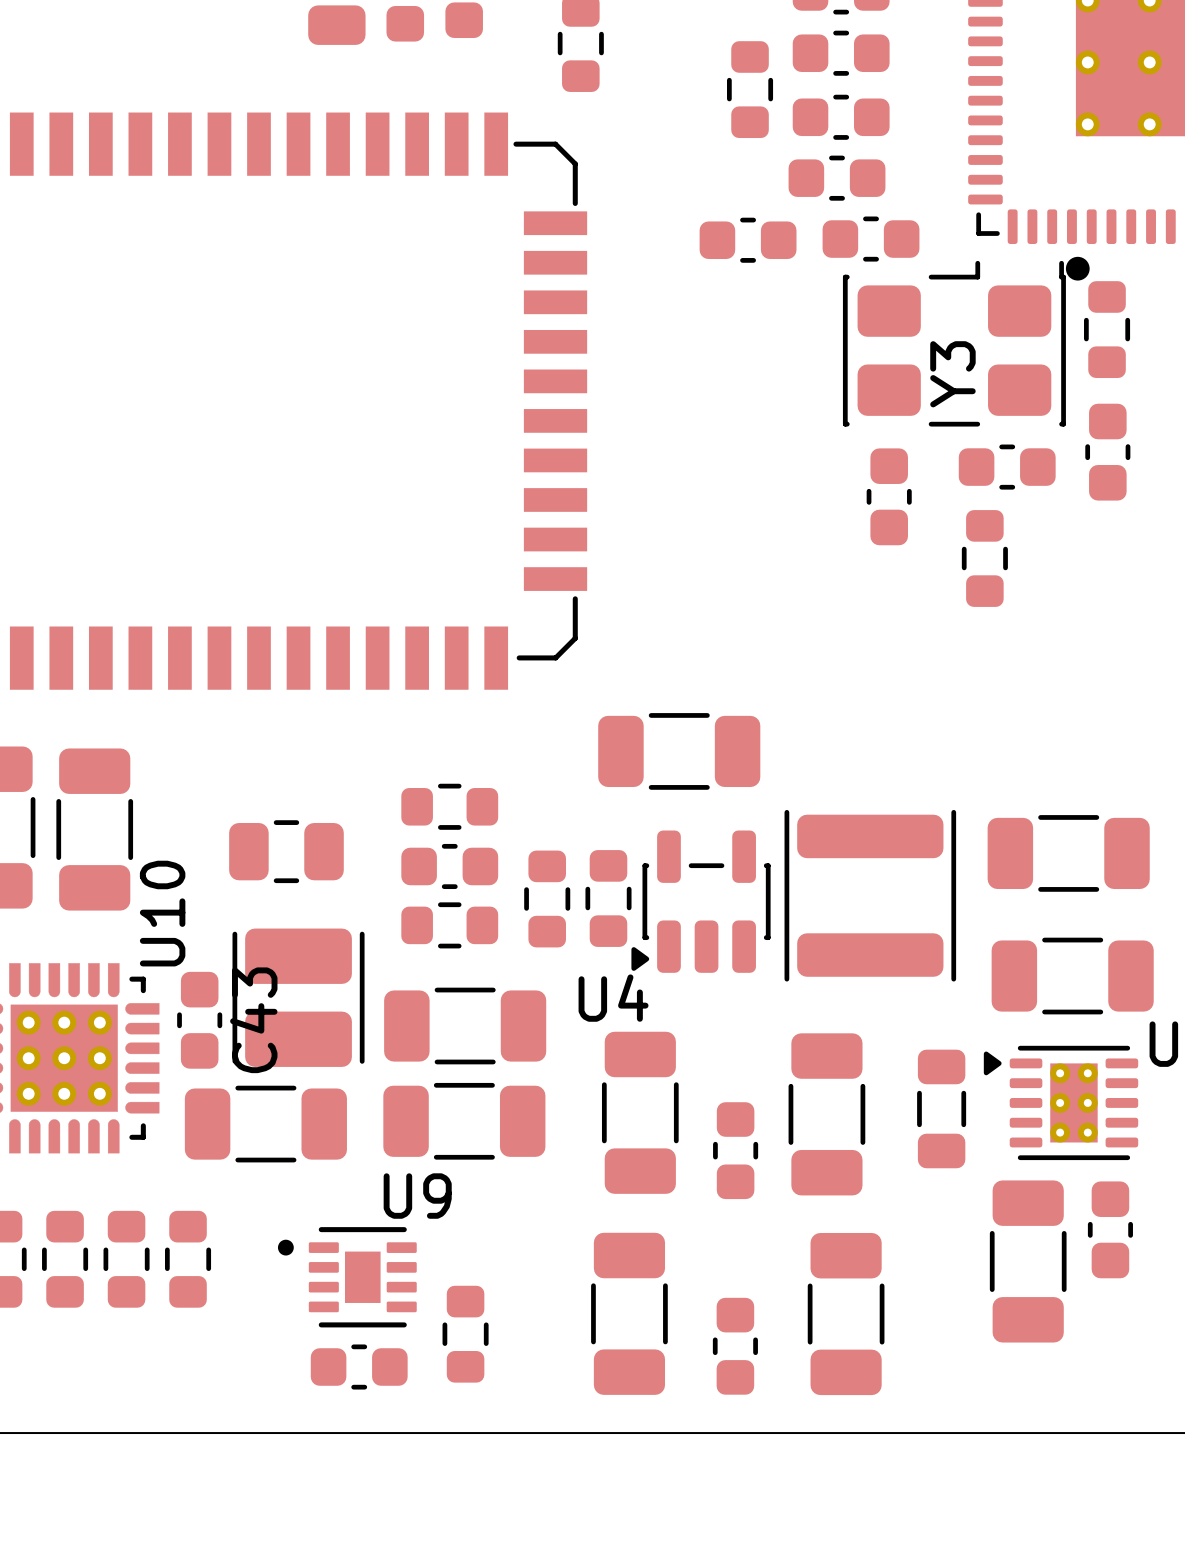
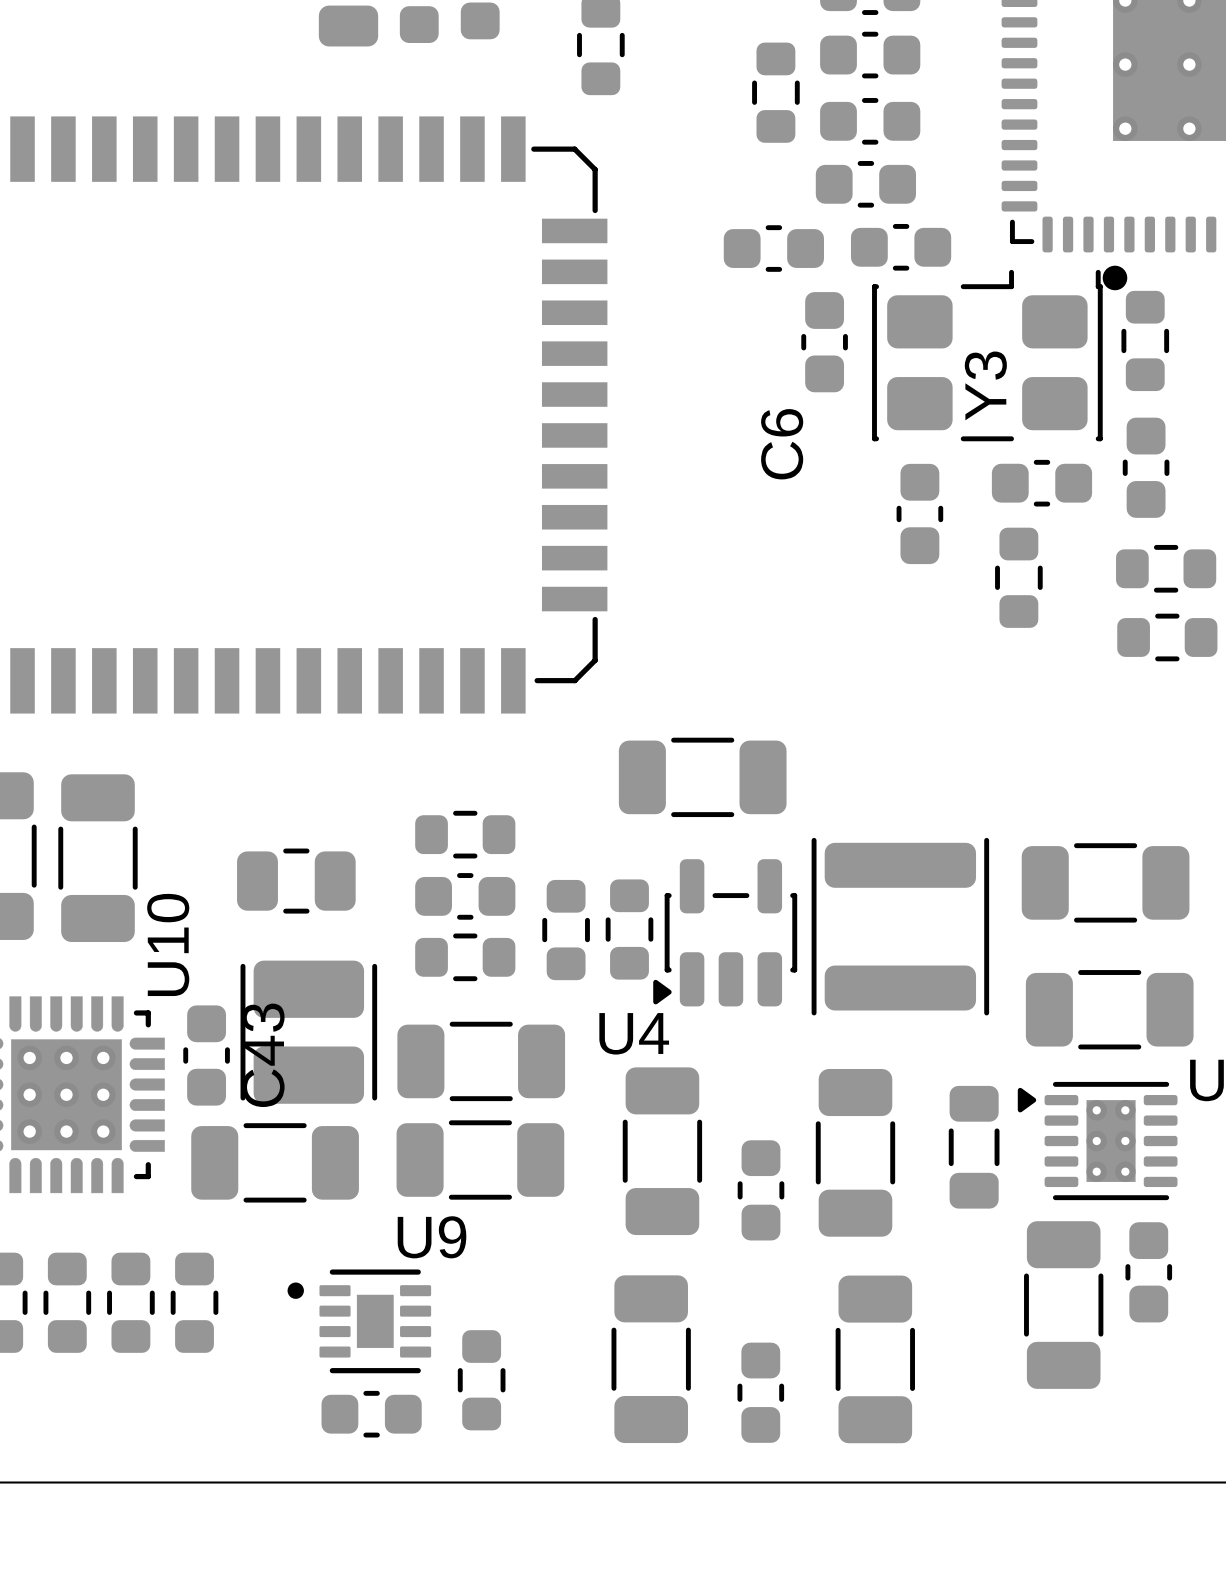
C6: none -> (824, 342)
part: none -> (1166, 568)
part: none -> (1167, 637)

